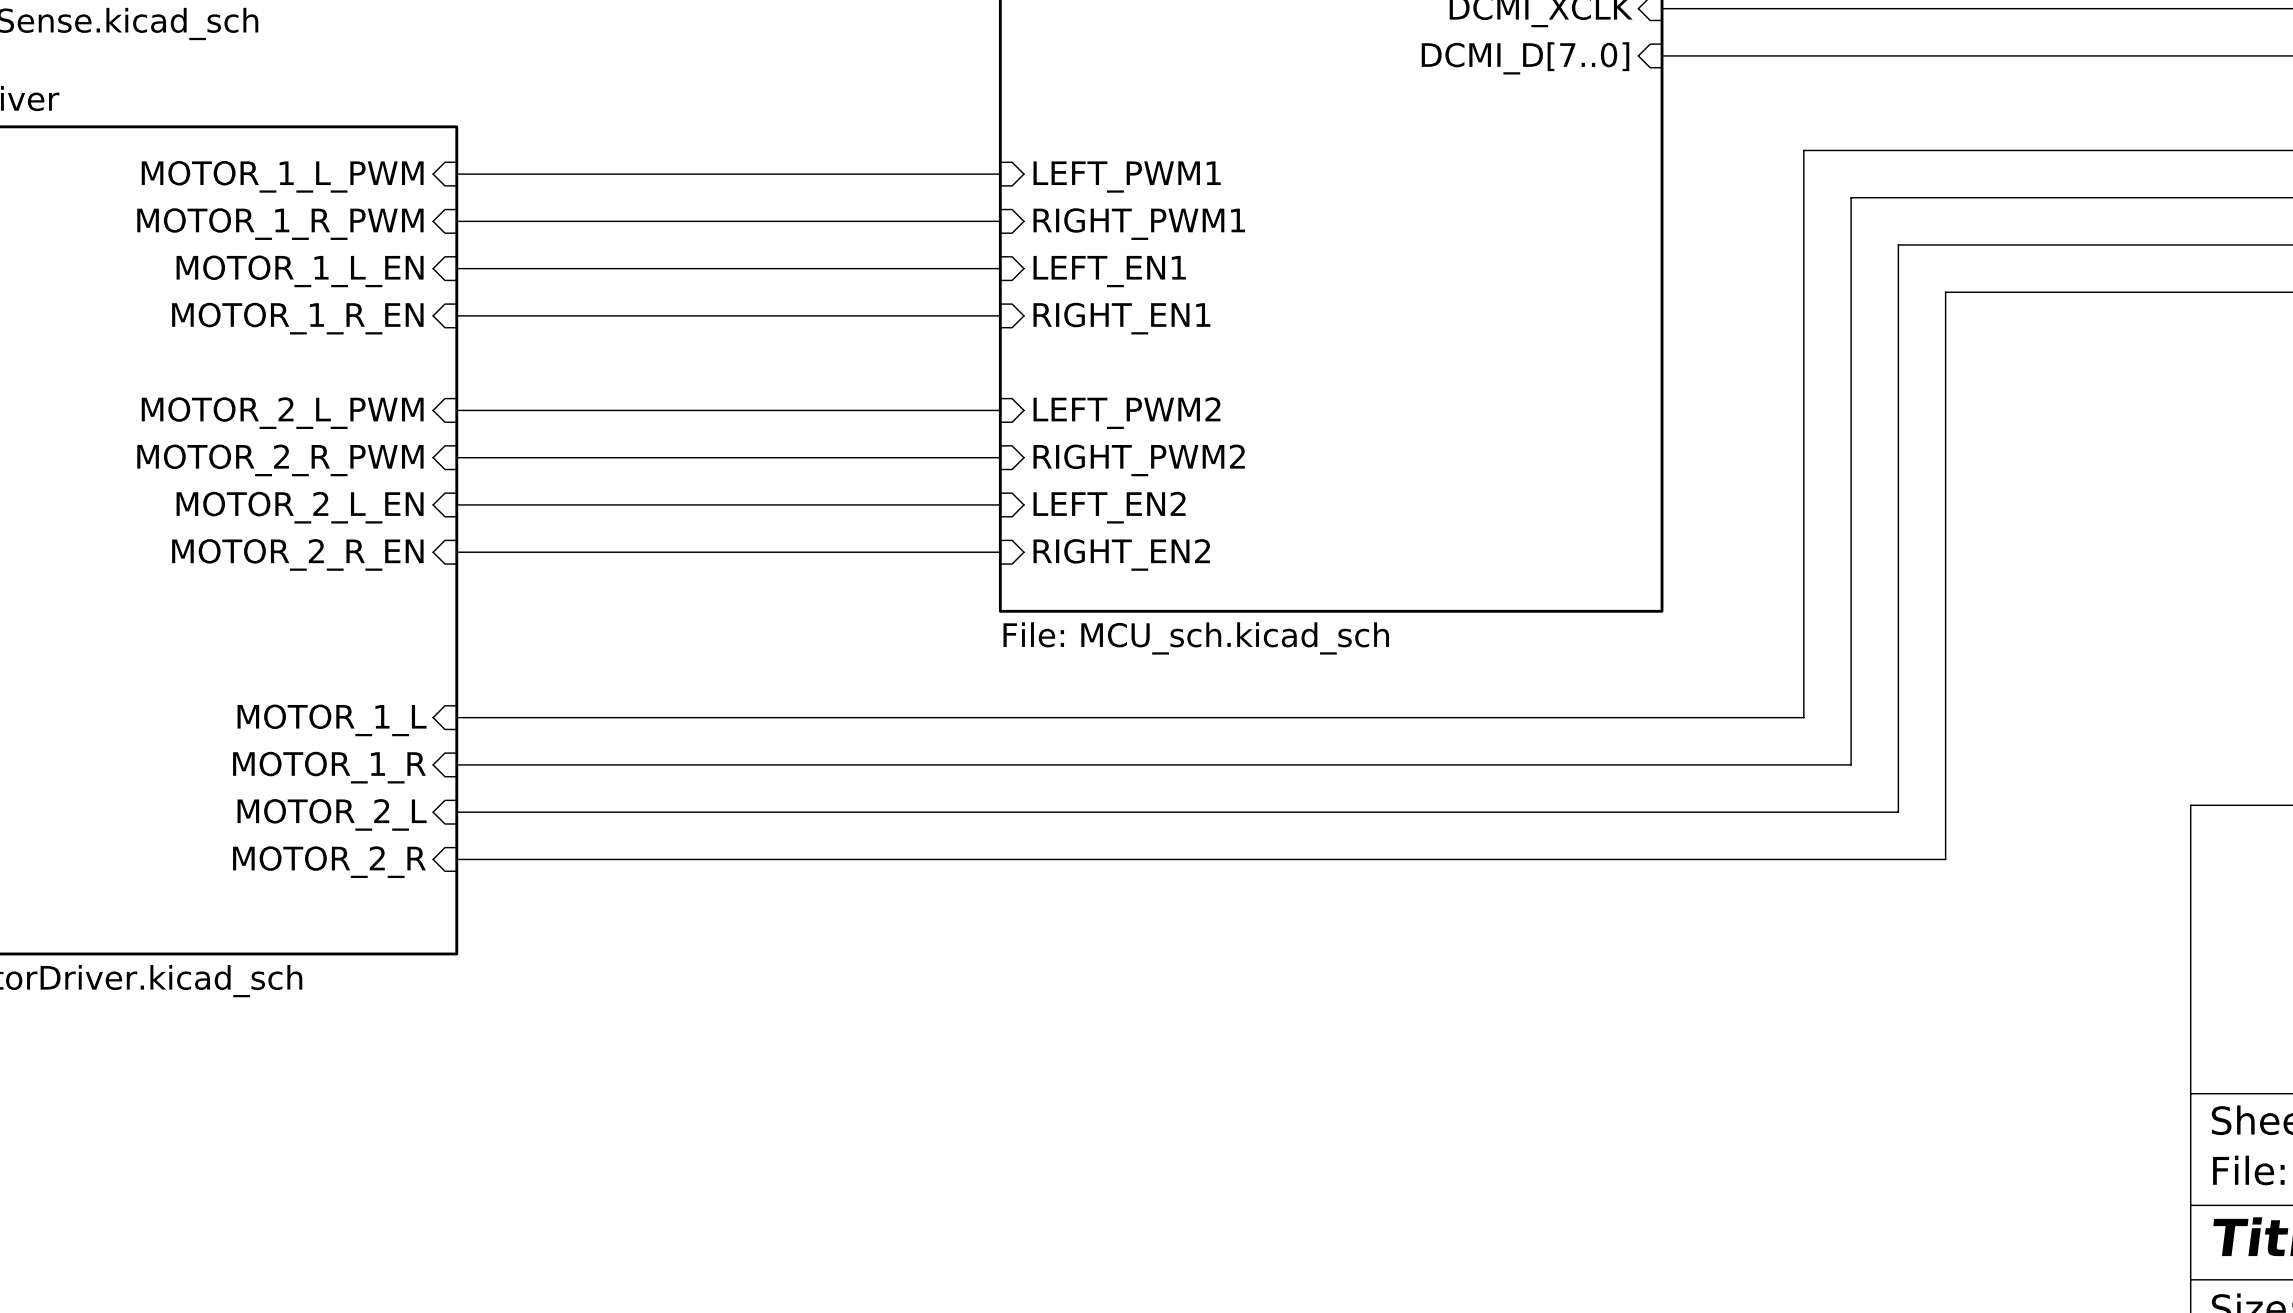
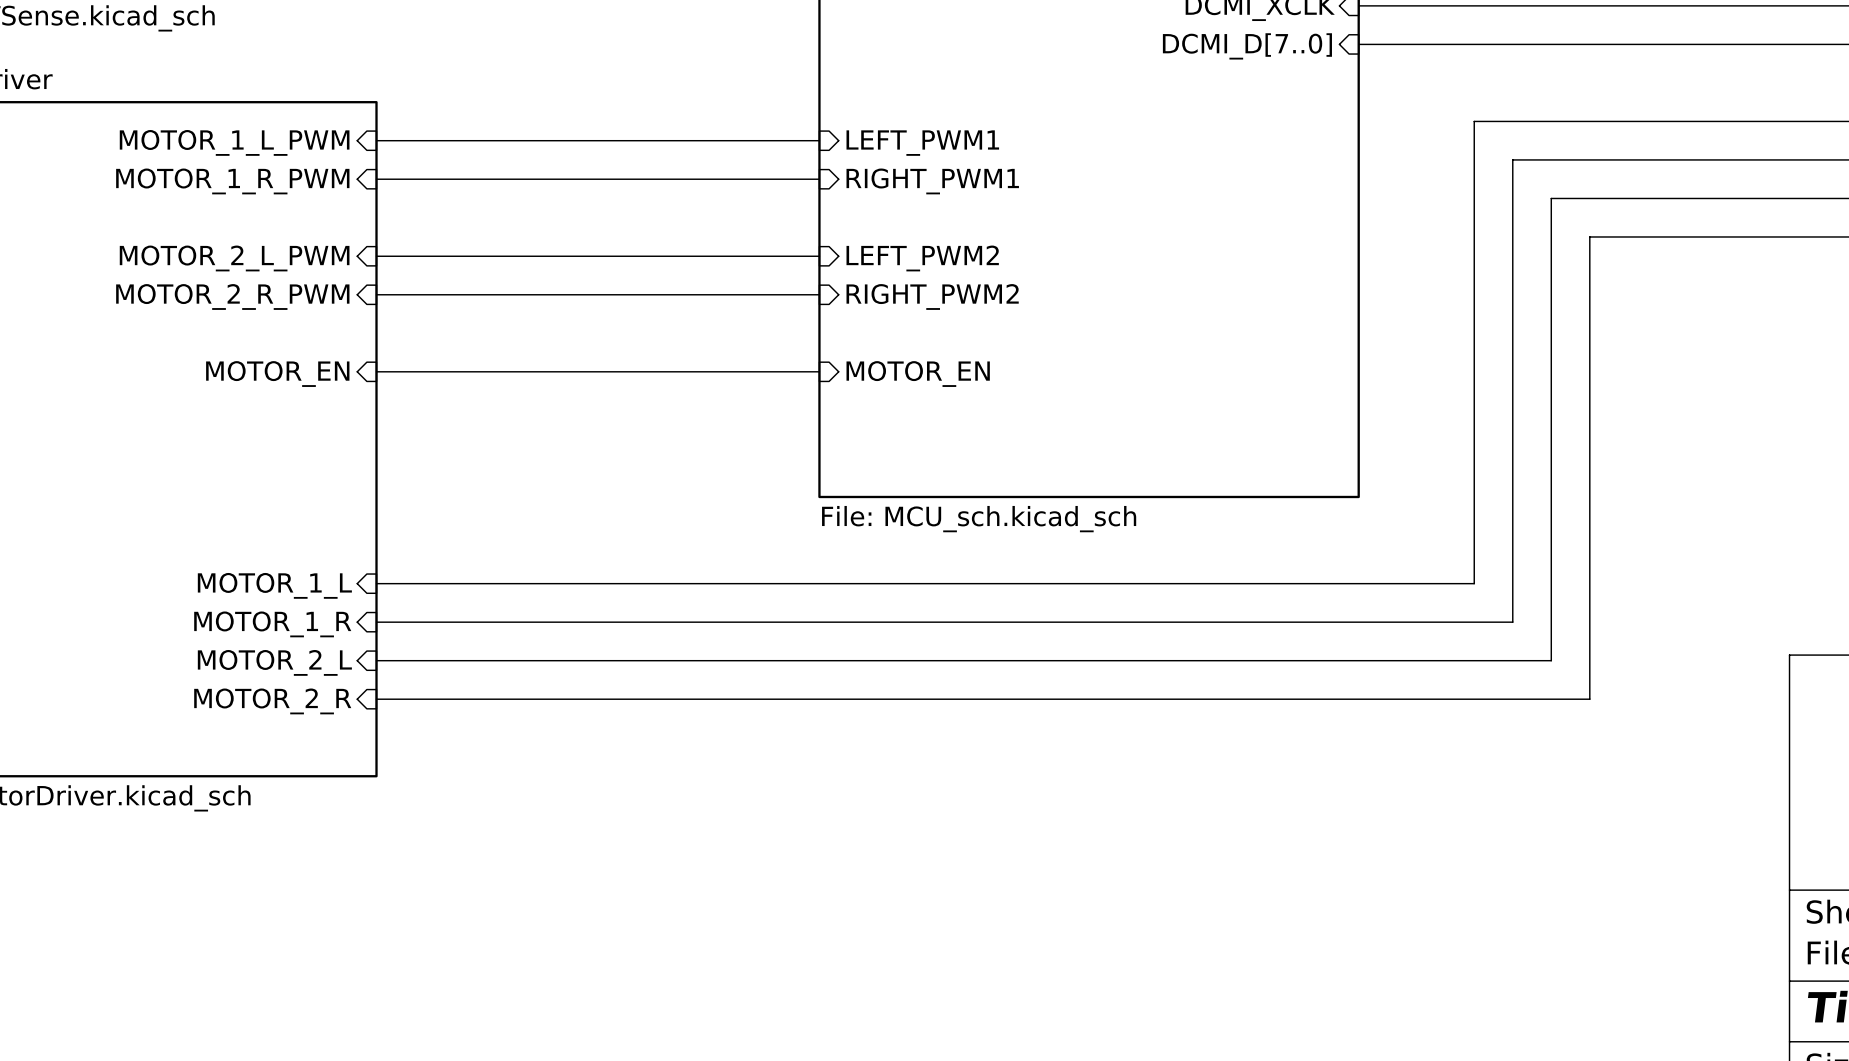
wire: (456, 268) (1000, 268) -> none
sheet pin: MOTOR_1_L_EN (300, 271) -> none
sheet pin: LEFT_EN1 (1109, 271) -> none
sheet pin: MOTOR_1_R_EN (297, 318) -> MOTOR_2_L_PWM (234, 258)
sheet pin: RIGHT_EN1 (1121, 318) -> LEFT_PWM2 (922, 258)
wire: (456, 410) (1000, 410) -> (376, 294) (819, 294)
sheet pin: MOTOR_2_L_PWM (282, 413) -> MOTOR_2_R_PWM (232, 296)
sheet pin: LEFT_PWM2 (1126, 413) -> RIGHT_PWM2 (932, 296)
sheet pin: MOTOR_2_R_PWM (280, 460) -> MOTOR_EN (277, 374)
sheet pin: RIGHT_PWM2 (1139, 460) -> MOTOR_EN (918, 374)
wire: (456, 504) (1000, 504) -> none
sheet pin: MOTOR_2_L_EN (300, 507) -> none
sheet pin: LEFT_EN2 (1109, 507) -> none
wire: (456, 552) (1000, 552) -> none
sheet pin: MOTOR_2_R_EN (297, 554) -> none
sheet pin: RIGHT_EN2 (1121, 554) -> none

